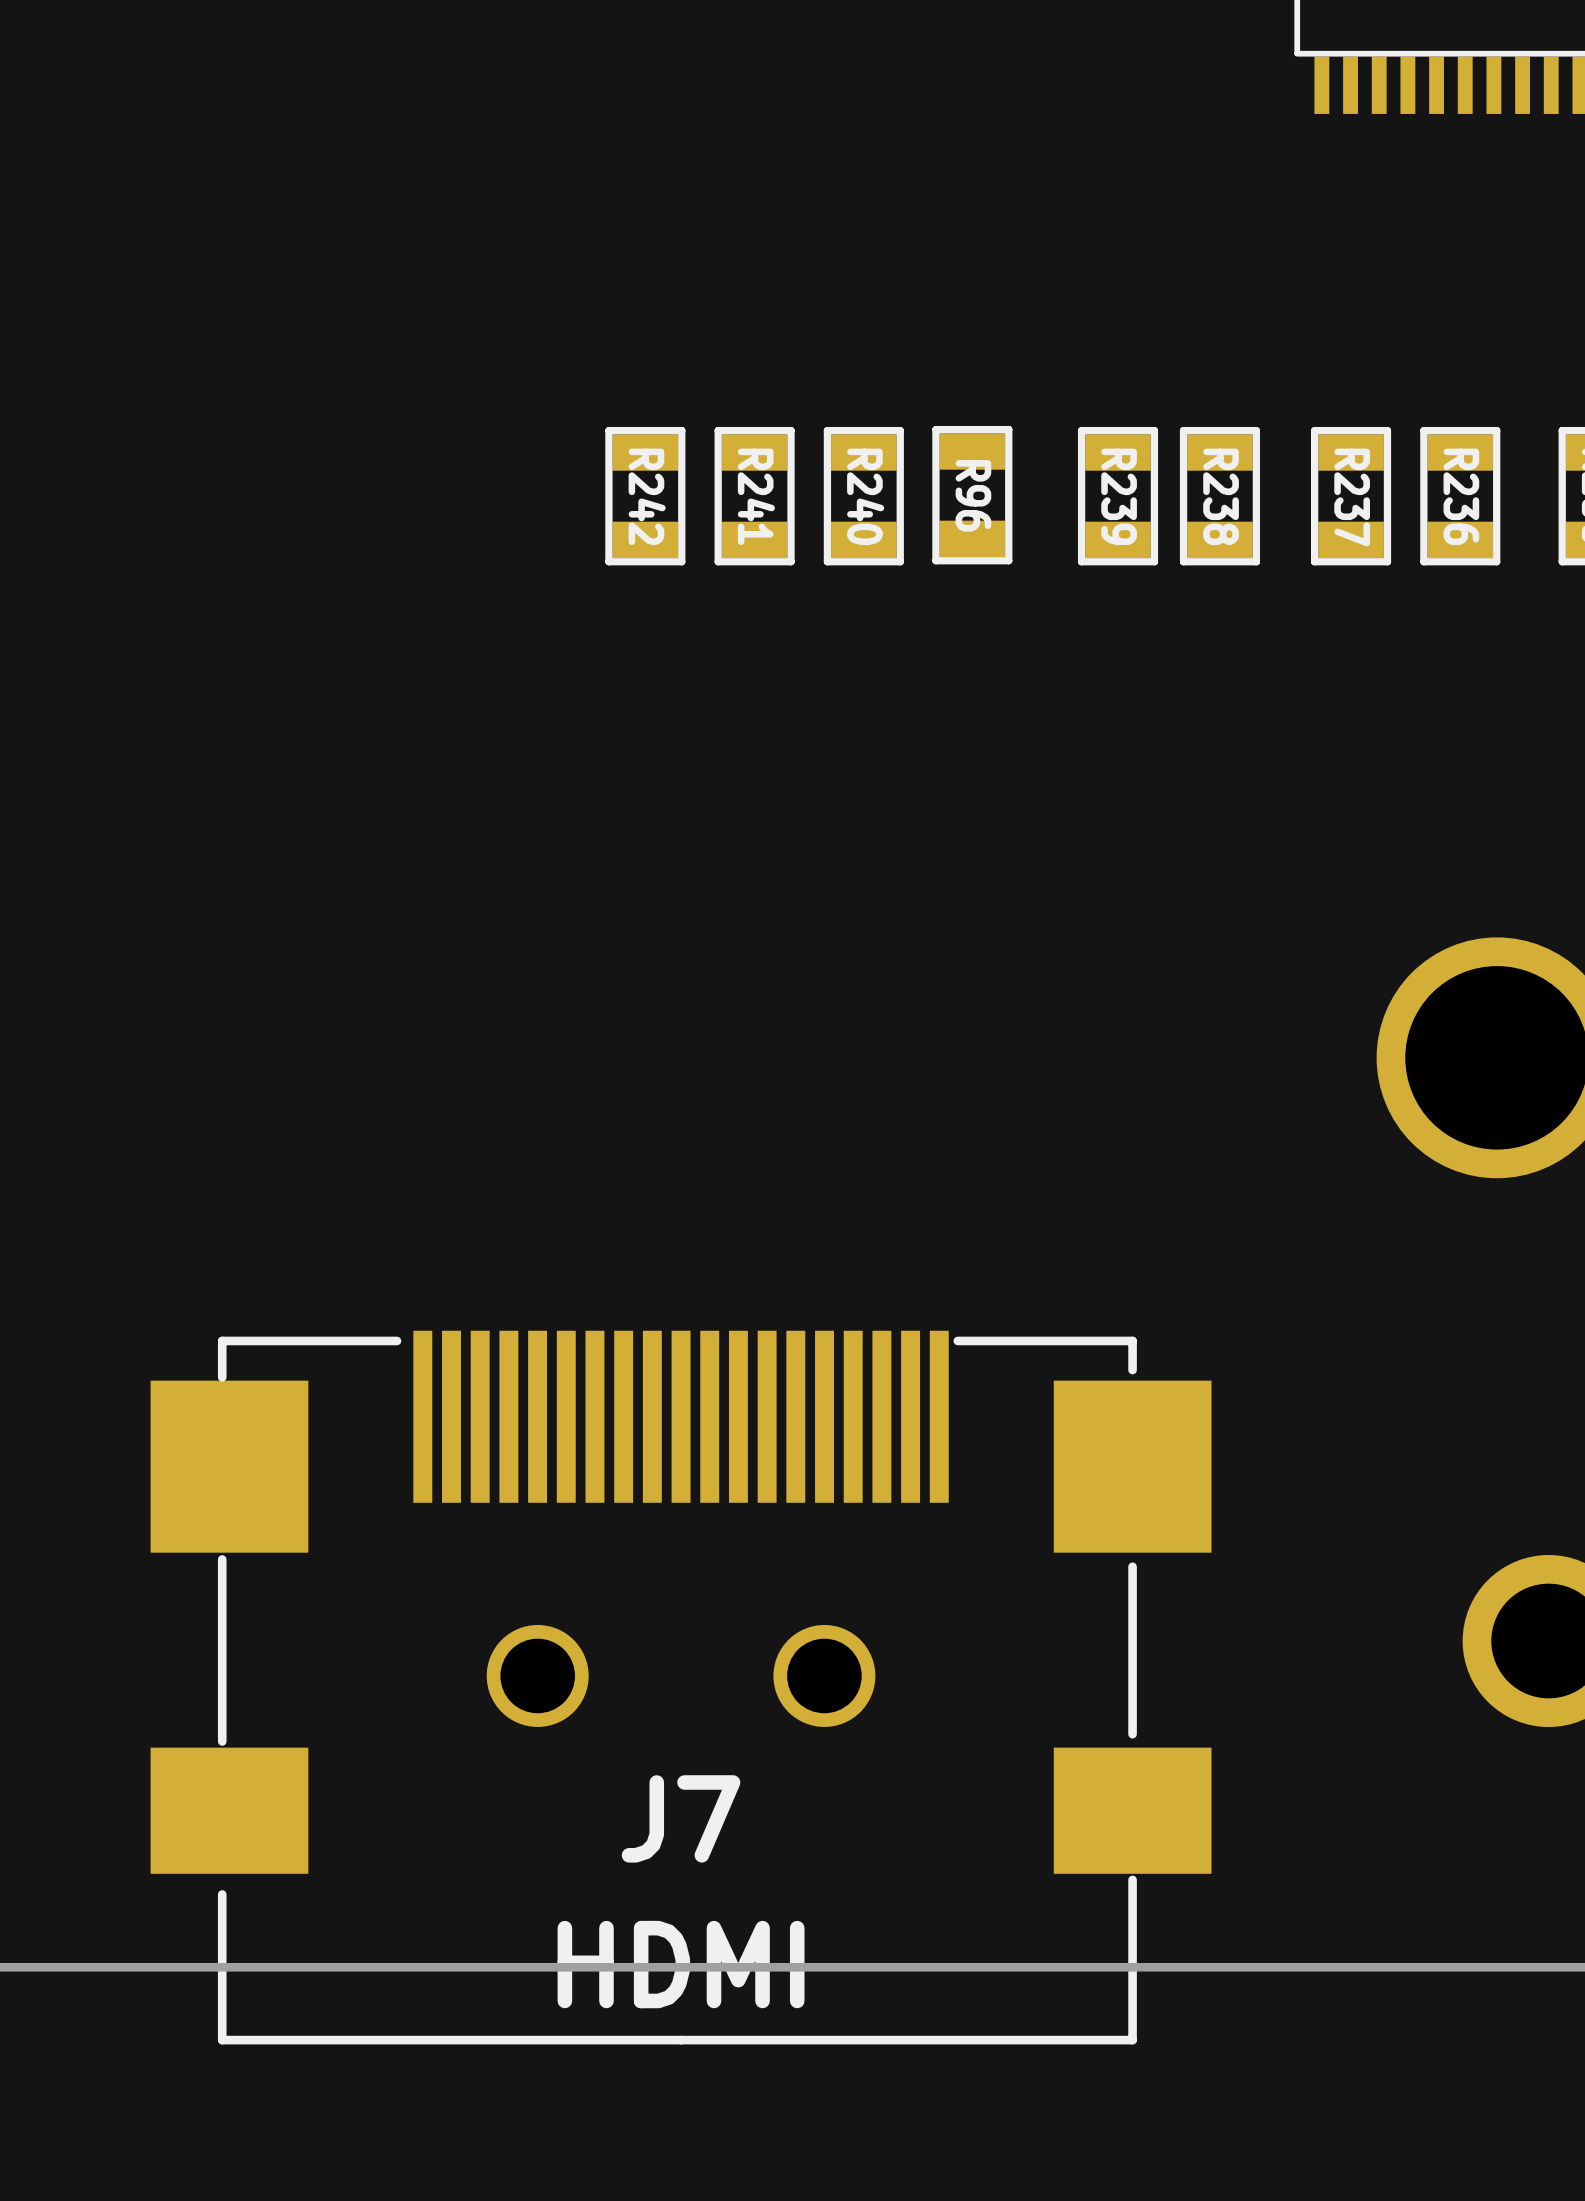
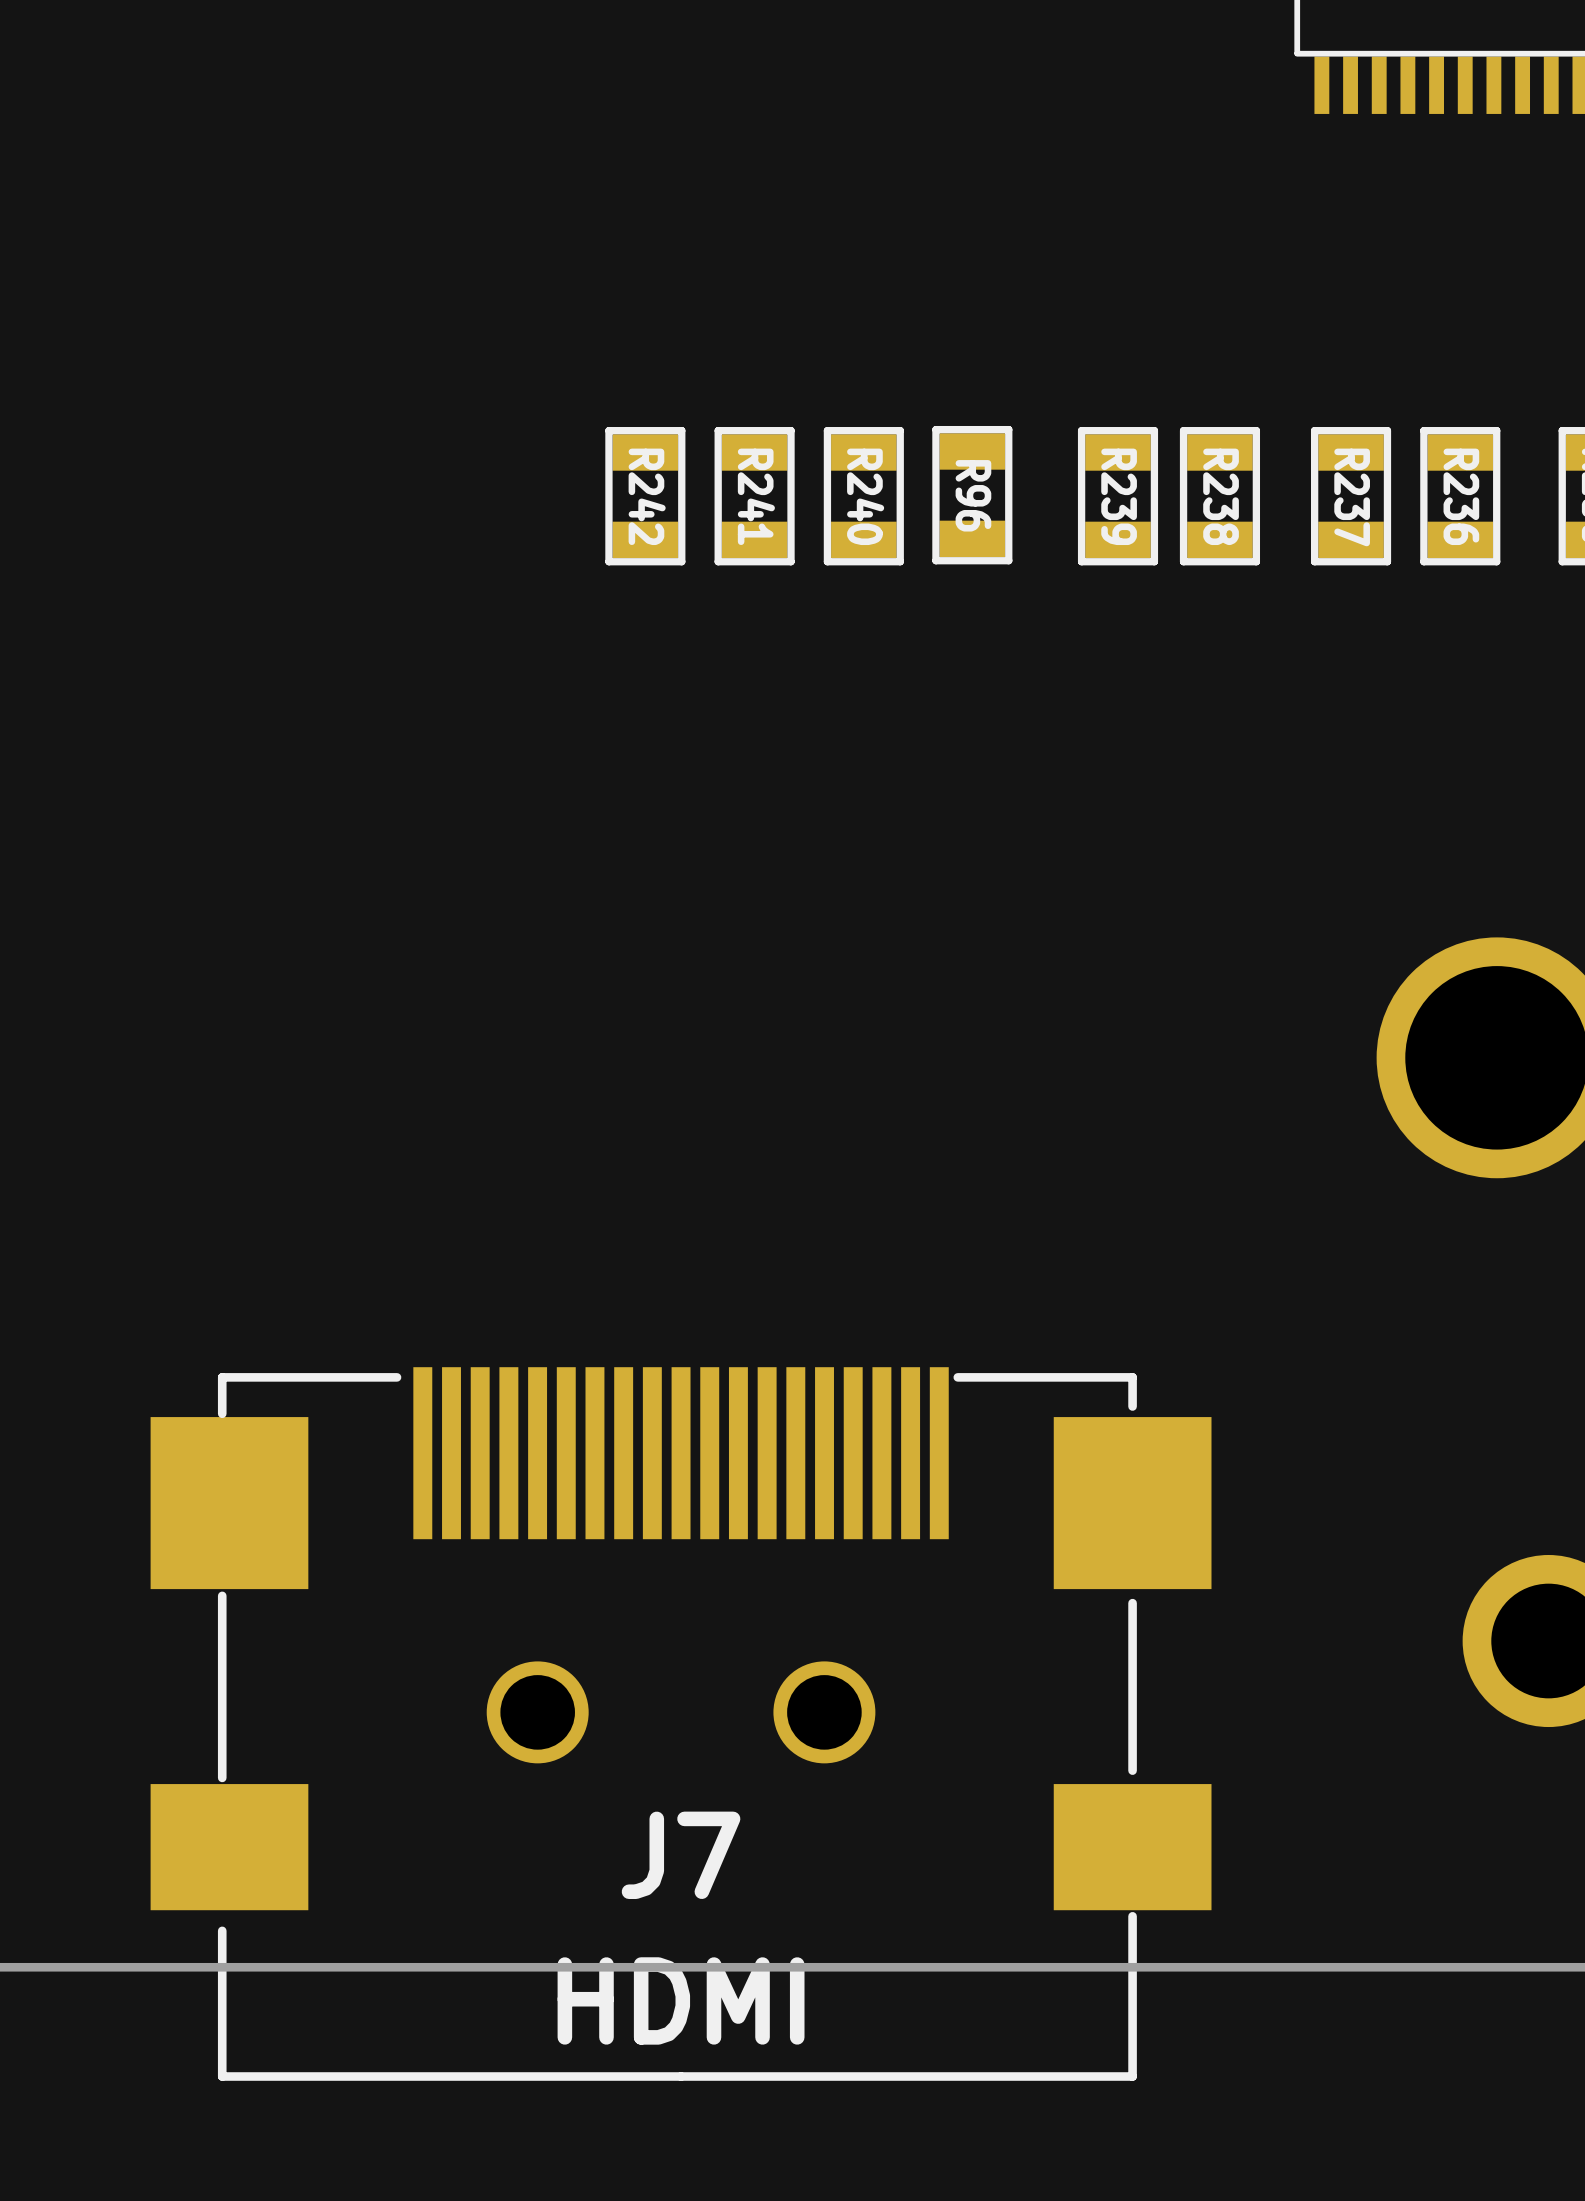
J7 position: (681, 1687) -> (681, 1723)

